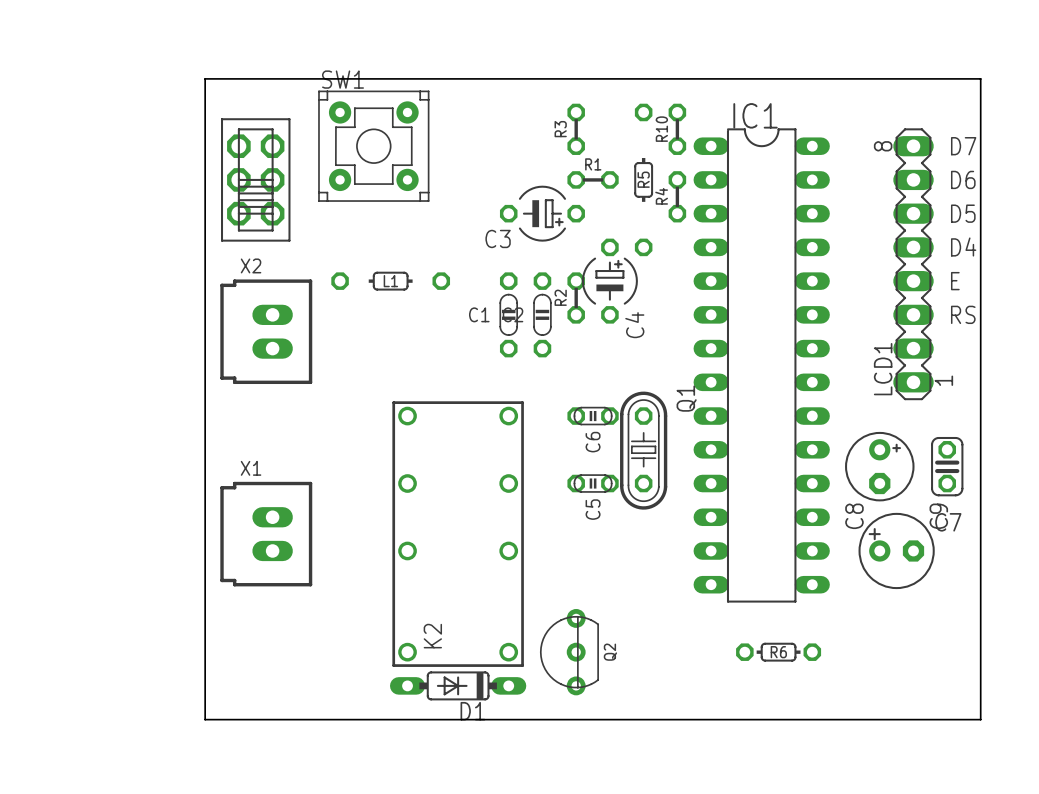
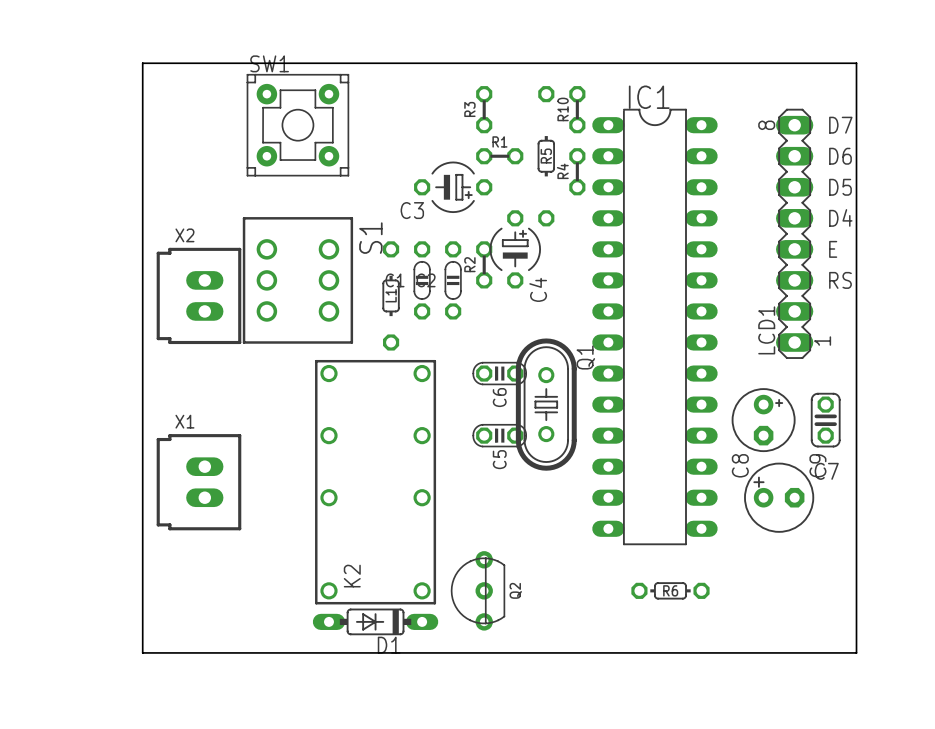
part: (255, 179) -> none
L1 rotation: 0° (390, 281) -> 90° clockwise (391, 295)
L1 position: (390, 281) -> (391, 295)
S1: none -> (297, 280)
Q1 footprint: [620, 391, 668, 510] -> [515, 338, 577, 471]
C6 footprint: [567, 406, 619, 426] -> [472, 361, 527, 386]
C5 footprint: [567, 474, 619, 493] -> [472, 423, 527, 448]

